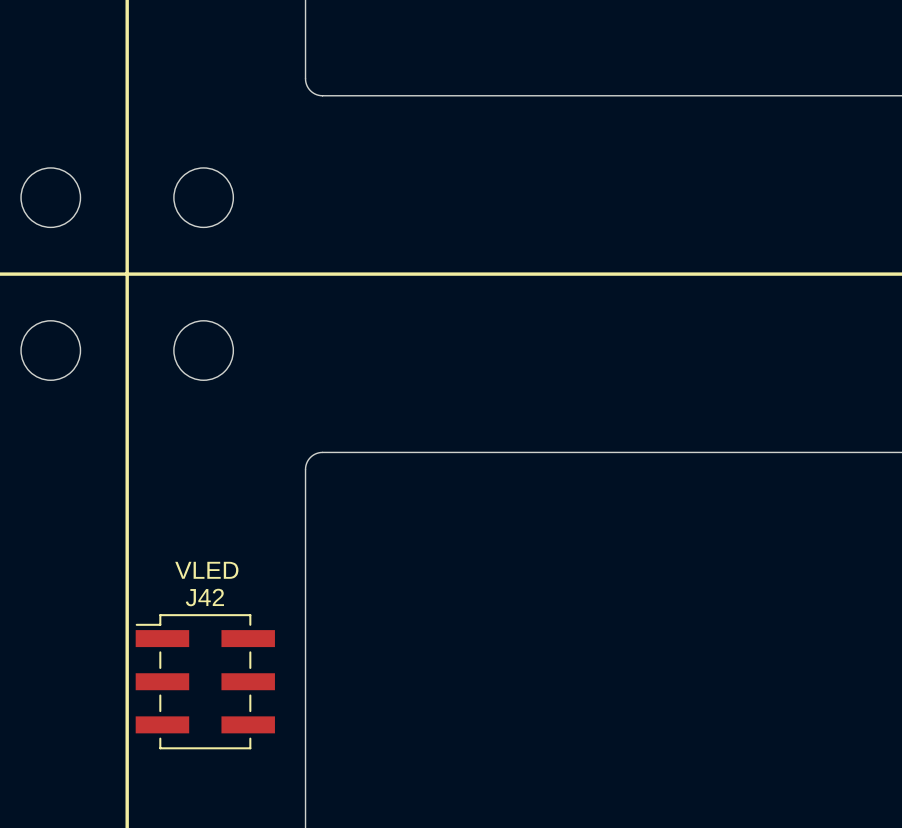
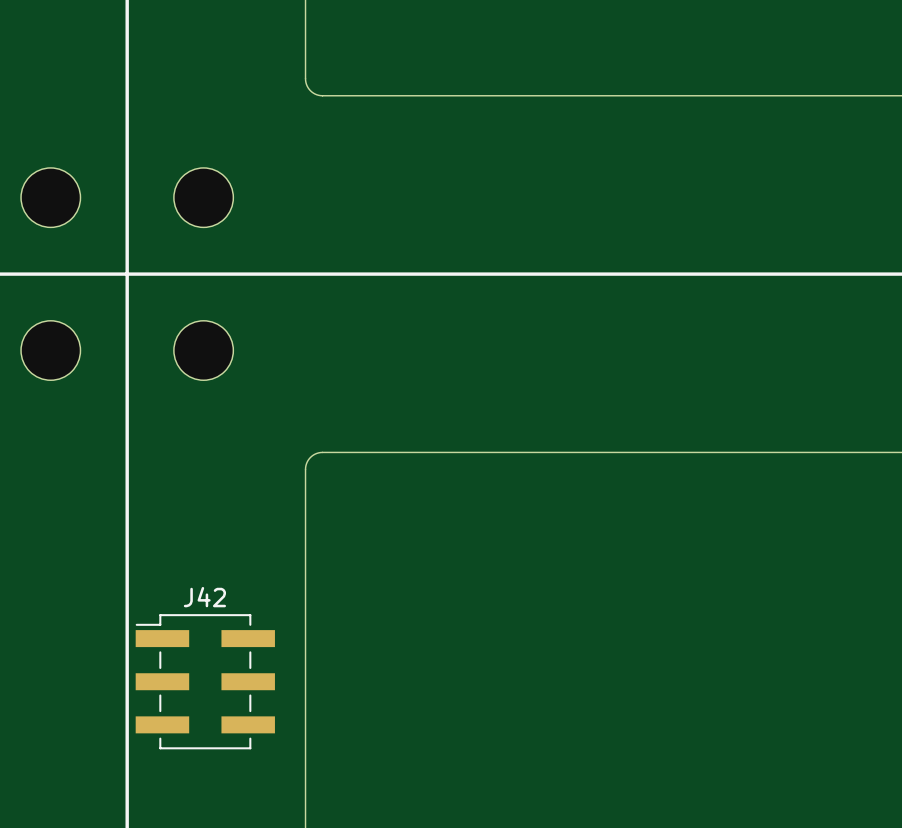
text: VLED (206, 570) -> none

